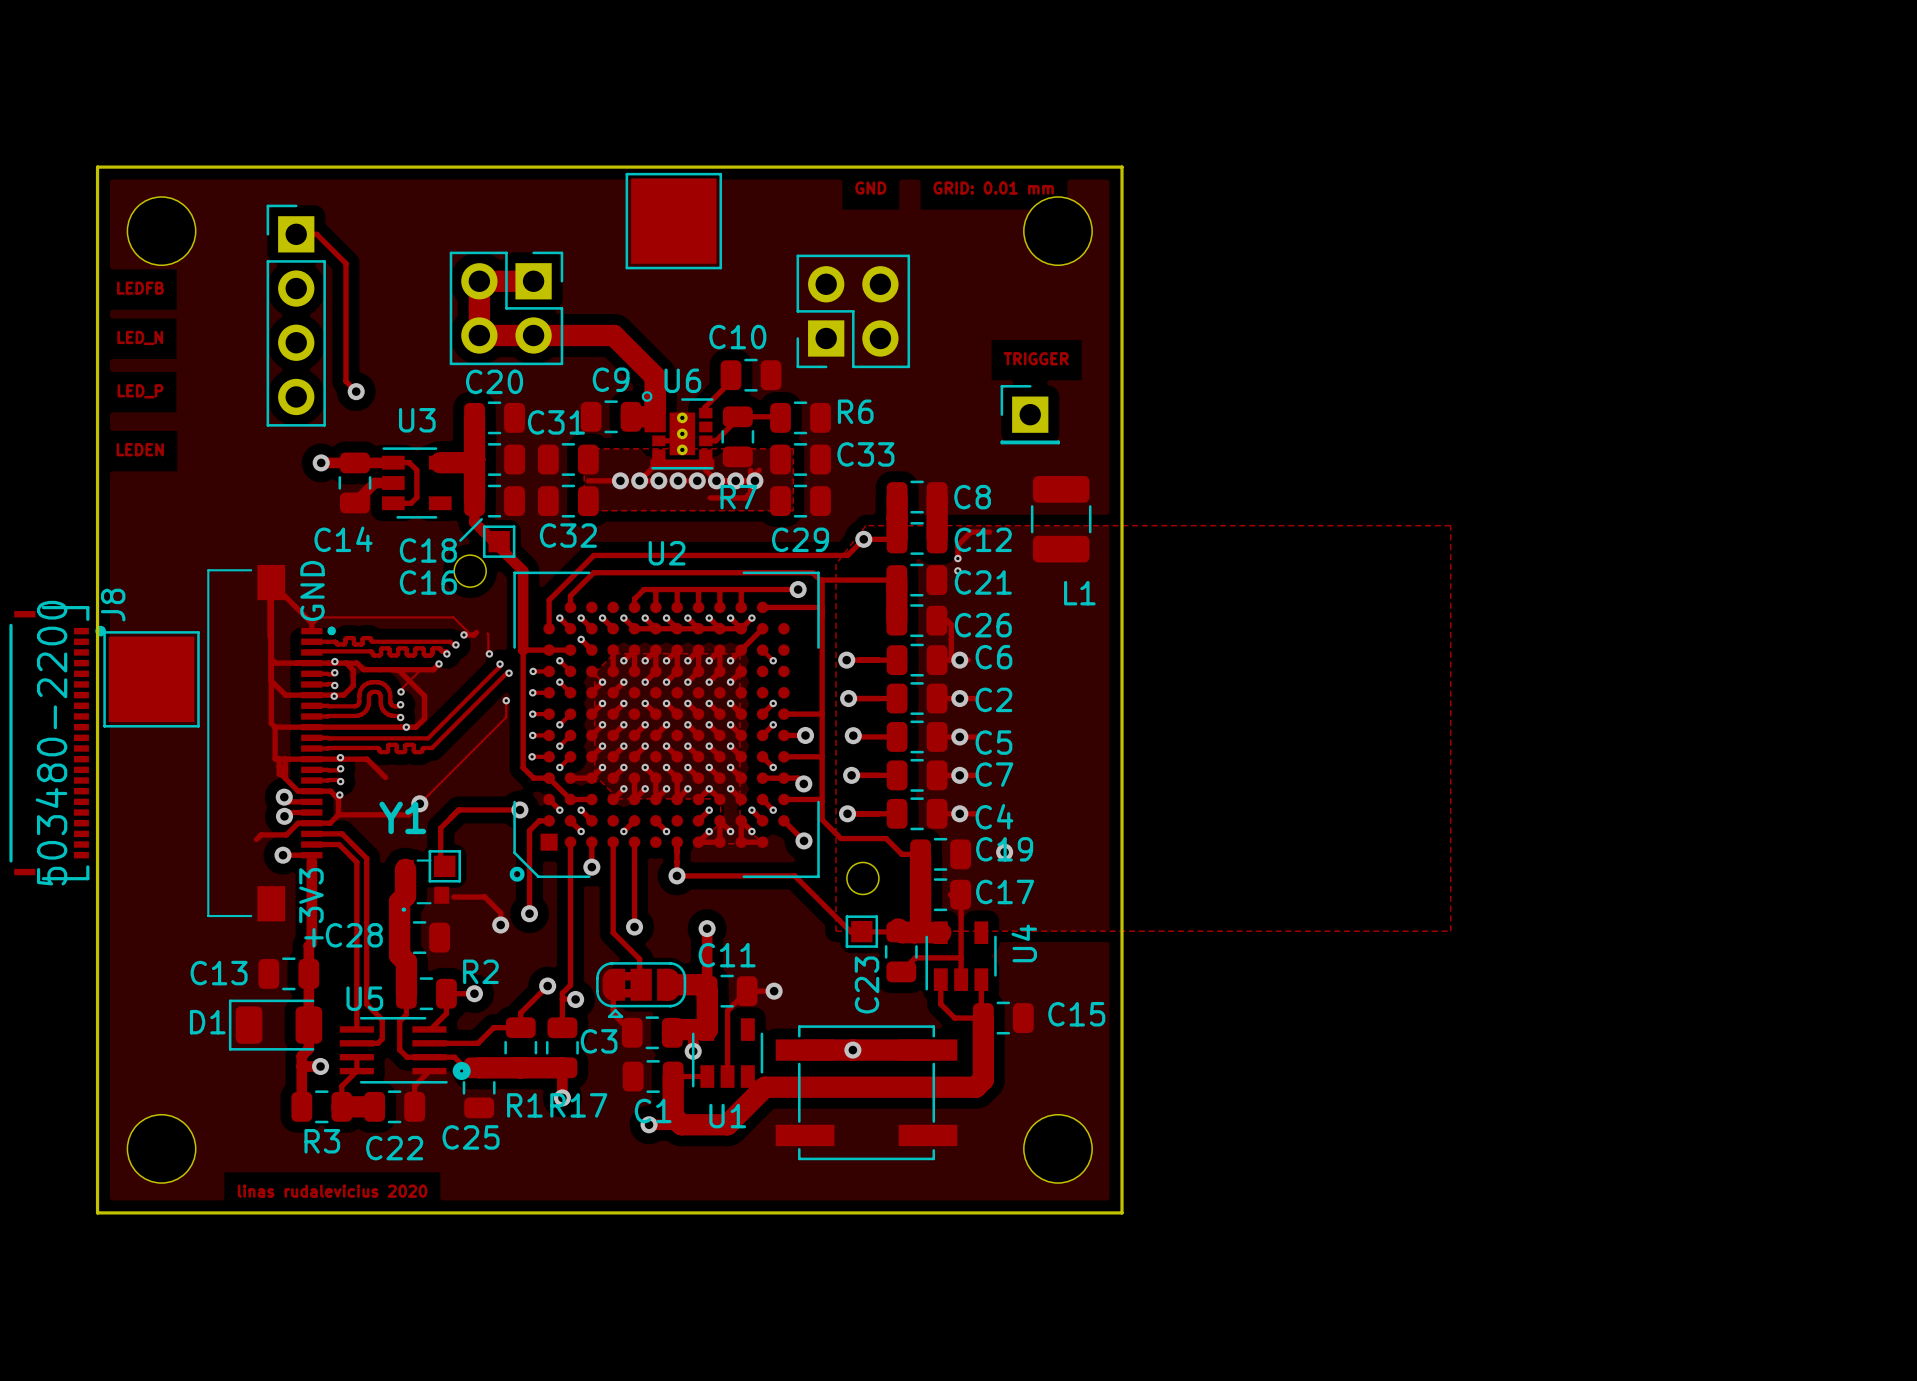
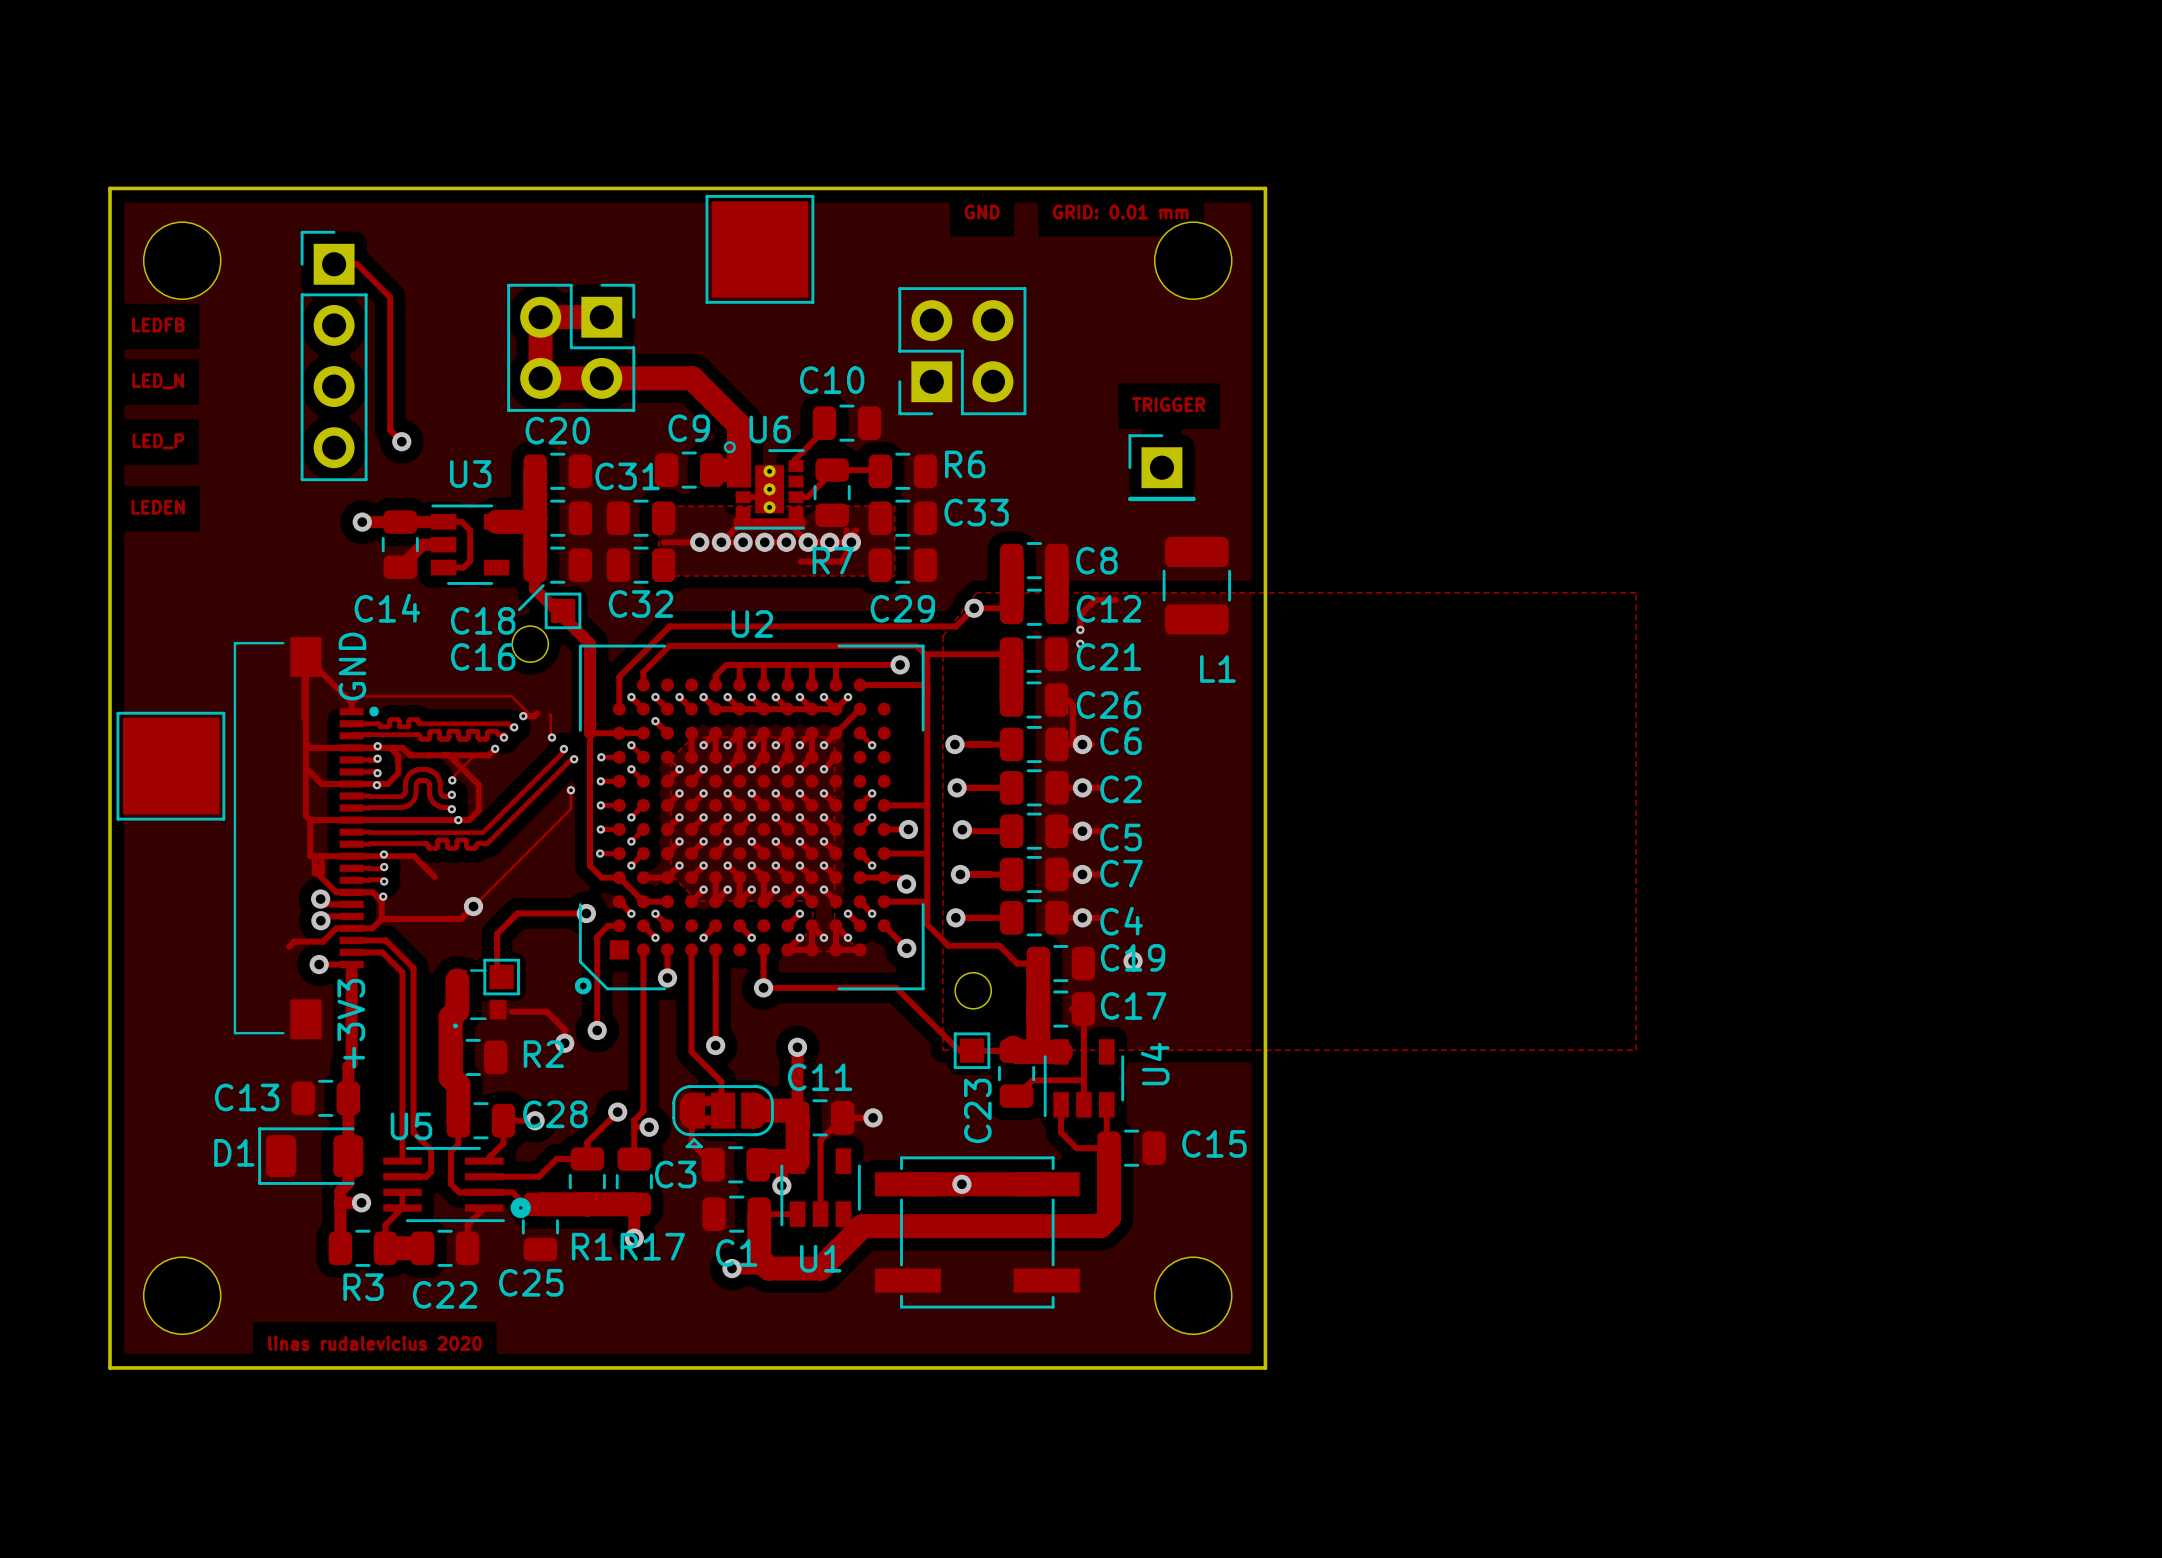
J8: 503480-2200 (57, 743) -> none
Y1 name: Y1 (402, 817) -> none
C28 name position: C28 (354, 935) -> C28 (555, 1114)
R2 name position: R2 (480, 971) -> R2 (543, 1054)

